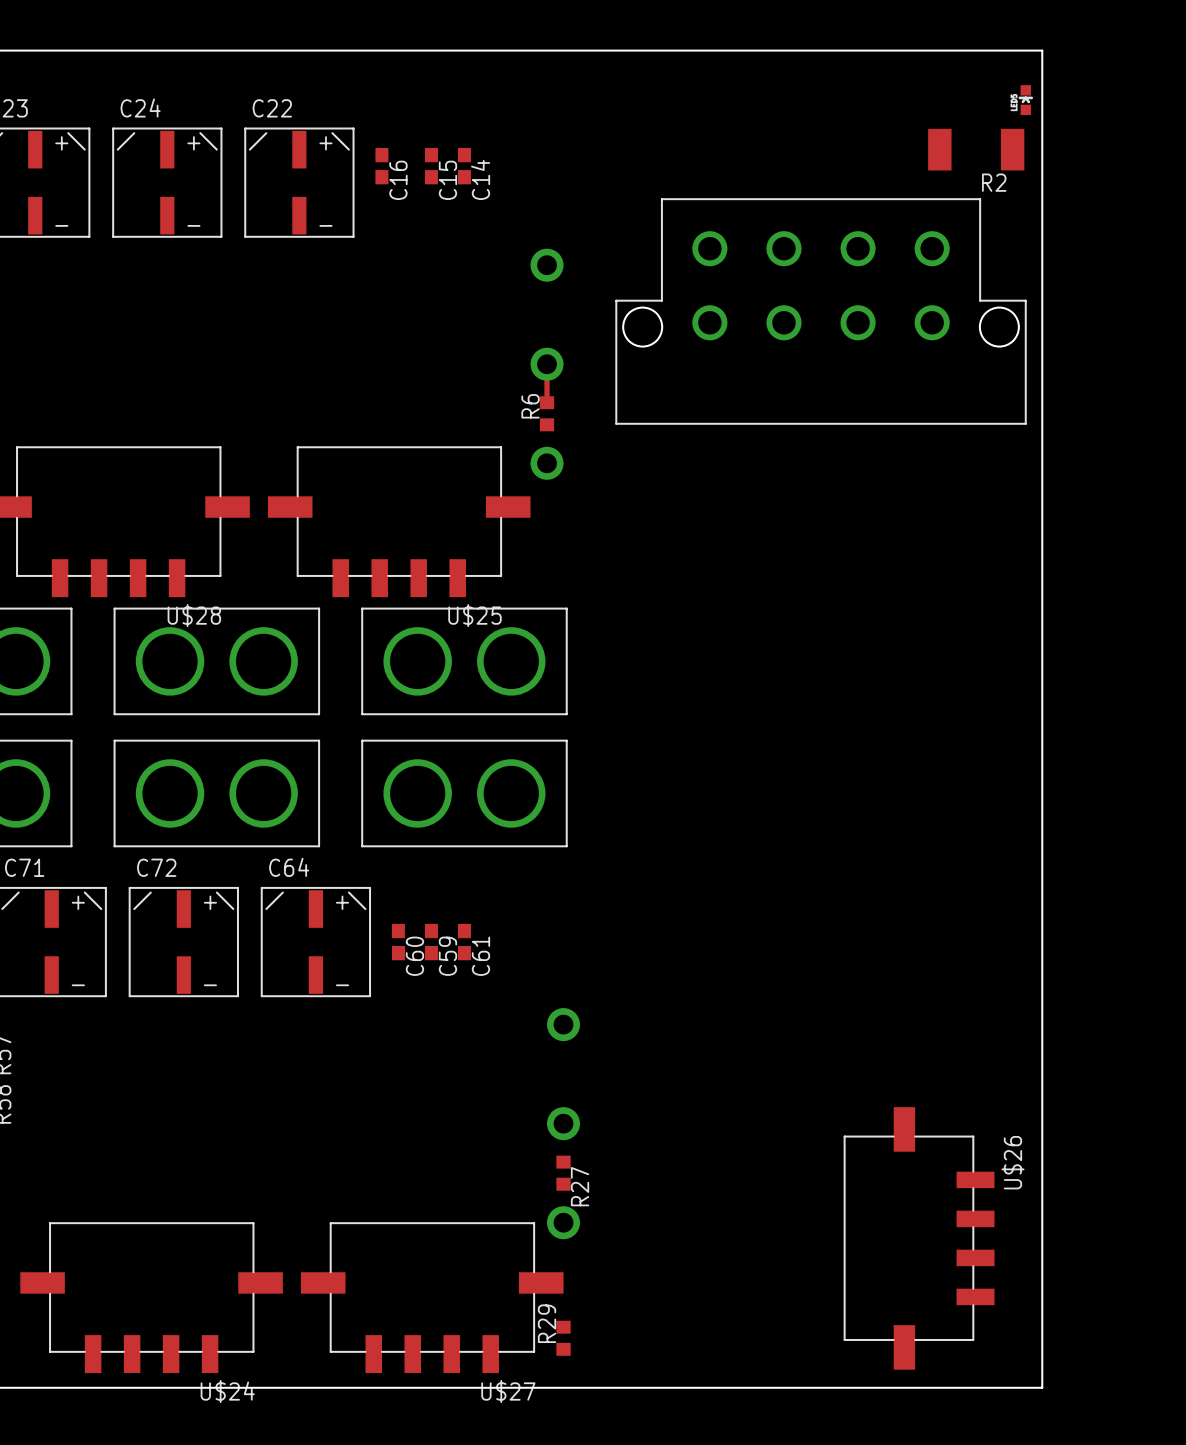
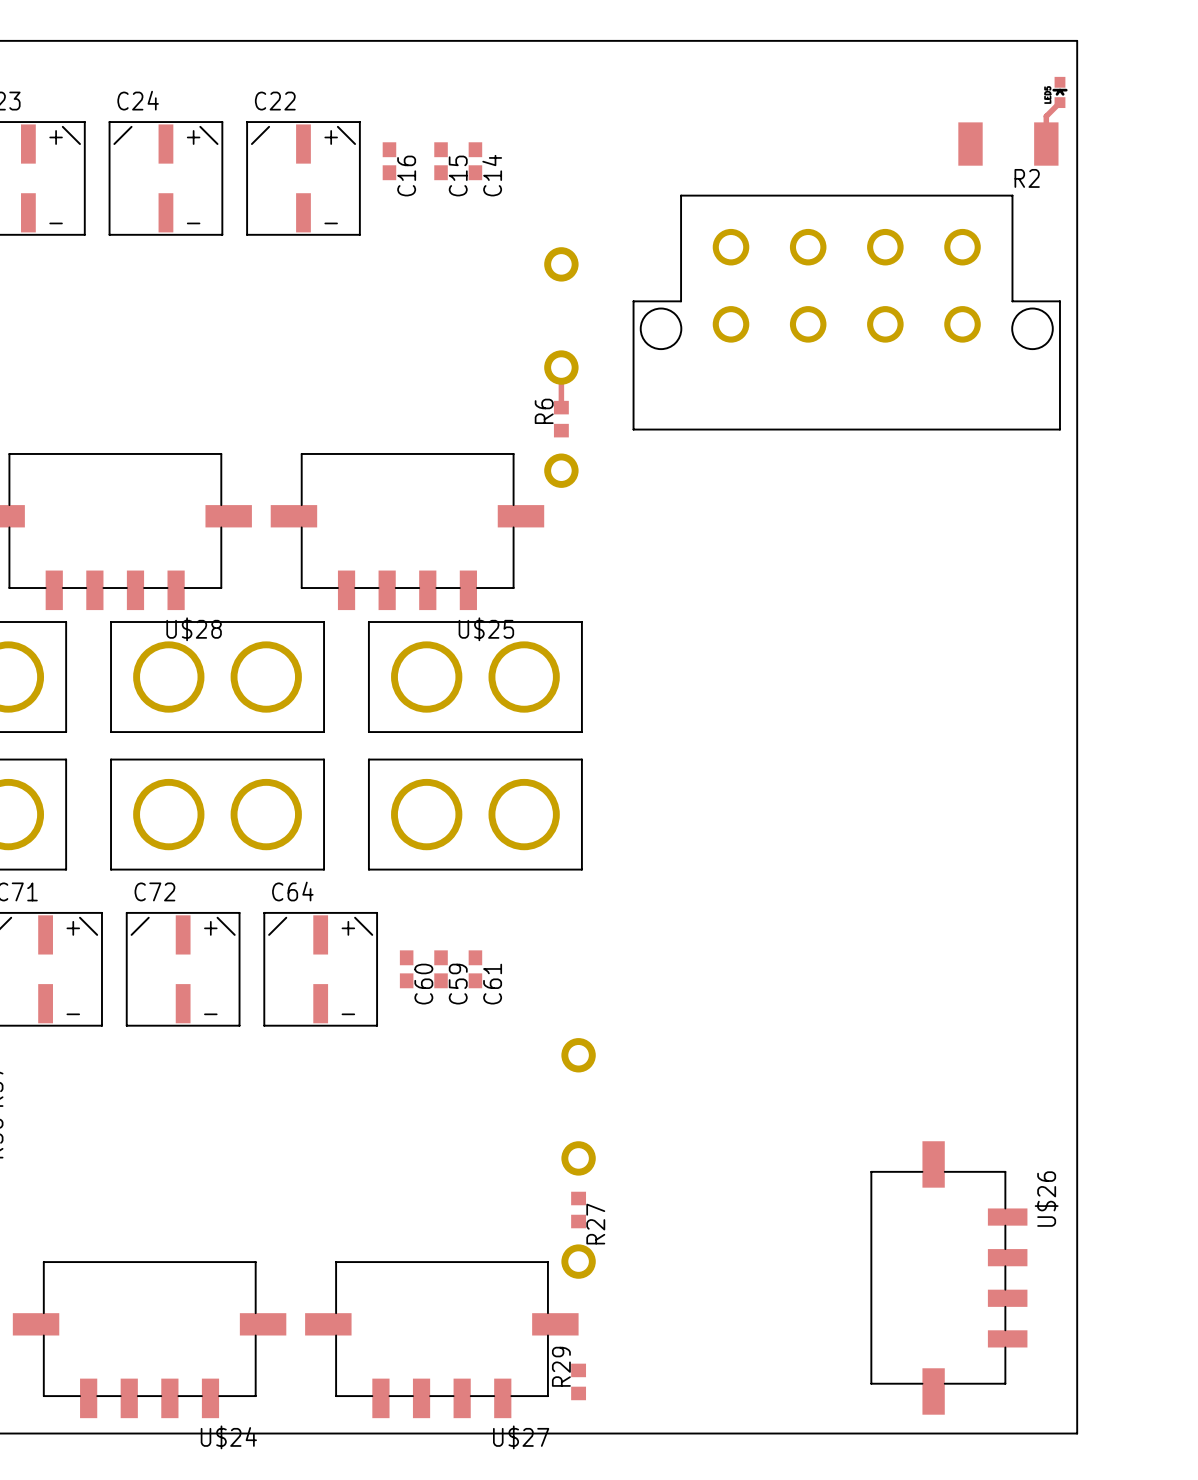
top track: none -> (1059, 102) (1046, 116) (1046, 144)

